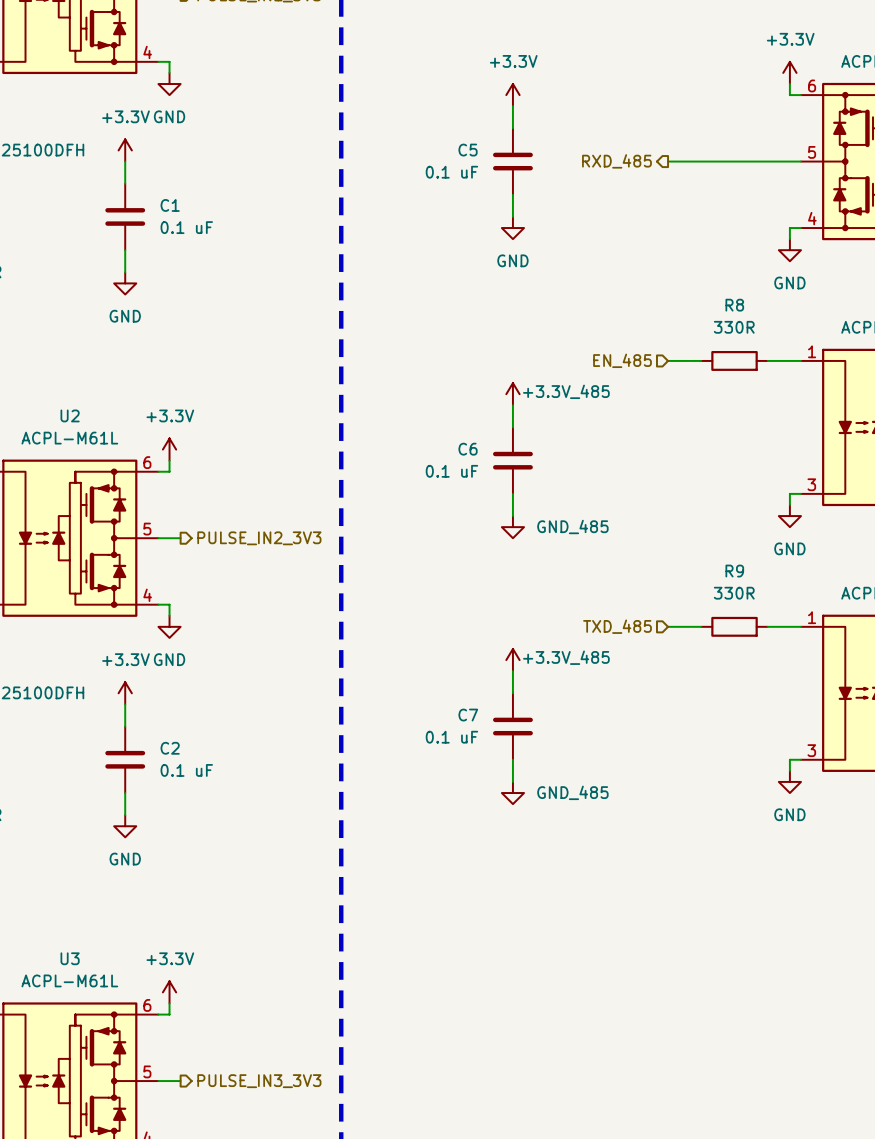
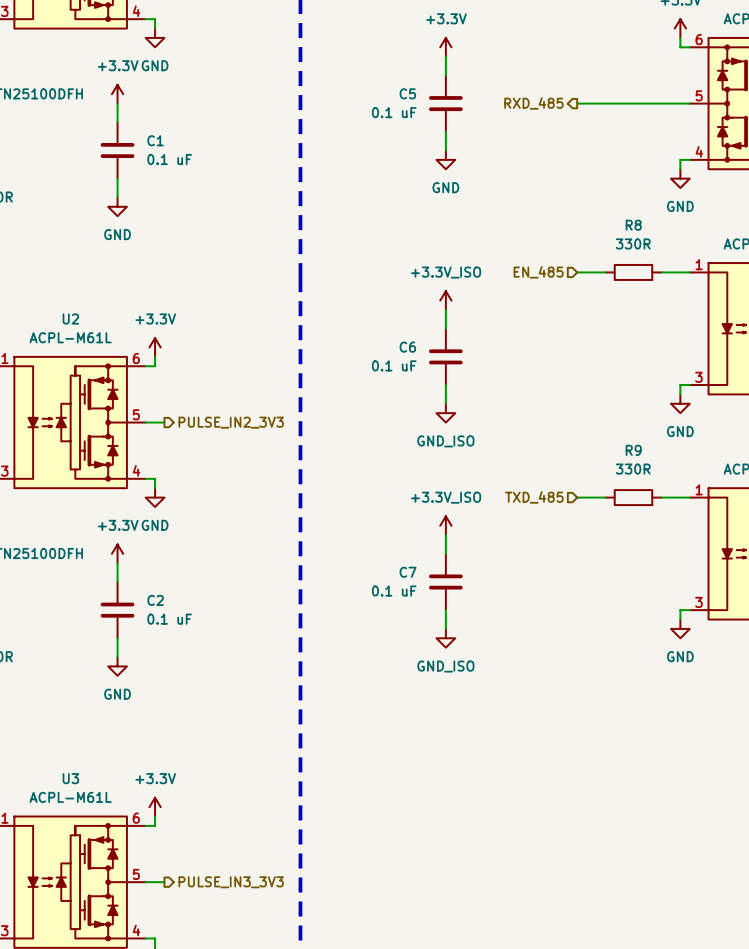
power symbol: +3.3V_485 (512, 394) -> +3.3V_ISO (445, 300)
power symbol: GND_485 (512, 527) -> GND_ISO (445, 413)
power symbol: +3.3V_485 (512, 660) -> +3.3V_ISO (445, 525)
power symbol: GND_485 (512, 793) -> GND_ISO (445, 638)

